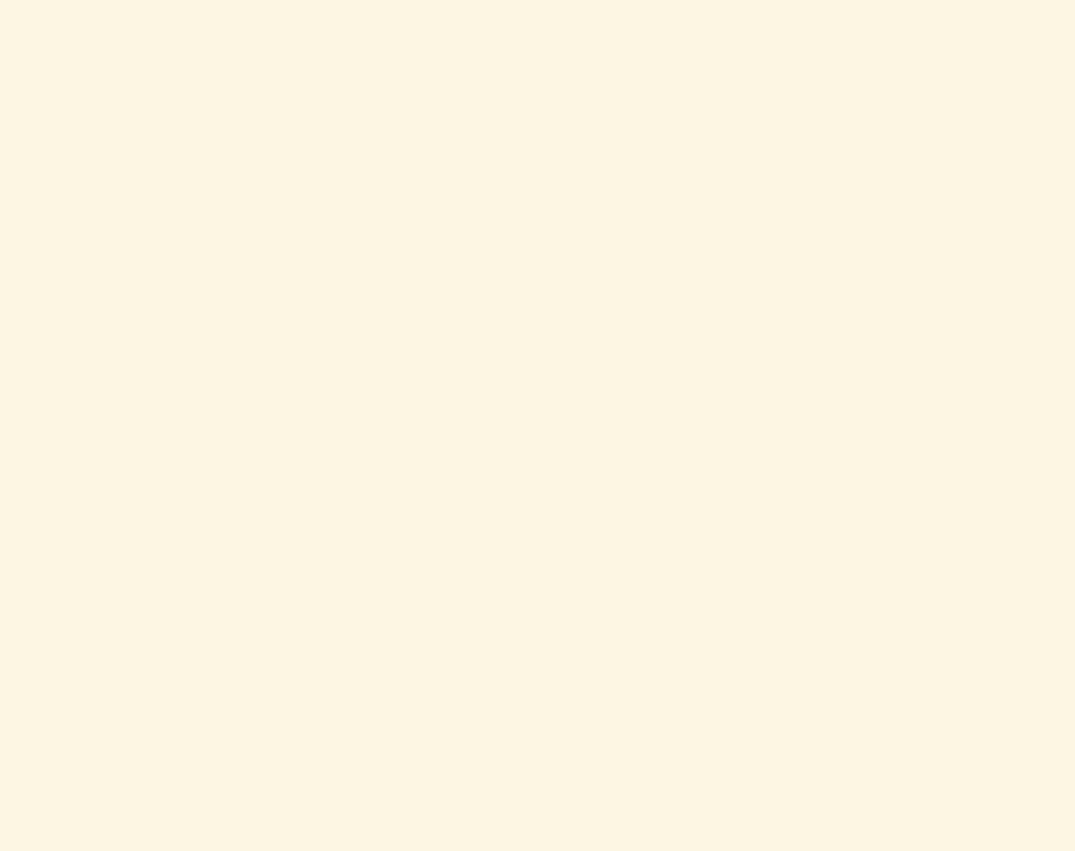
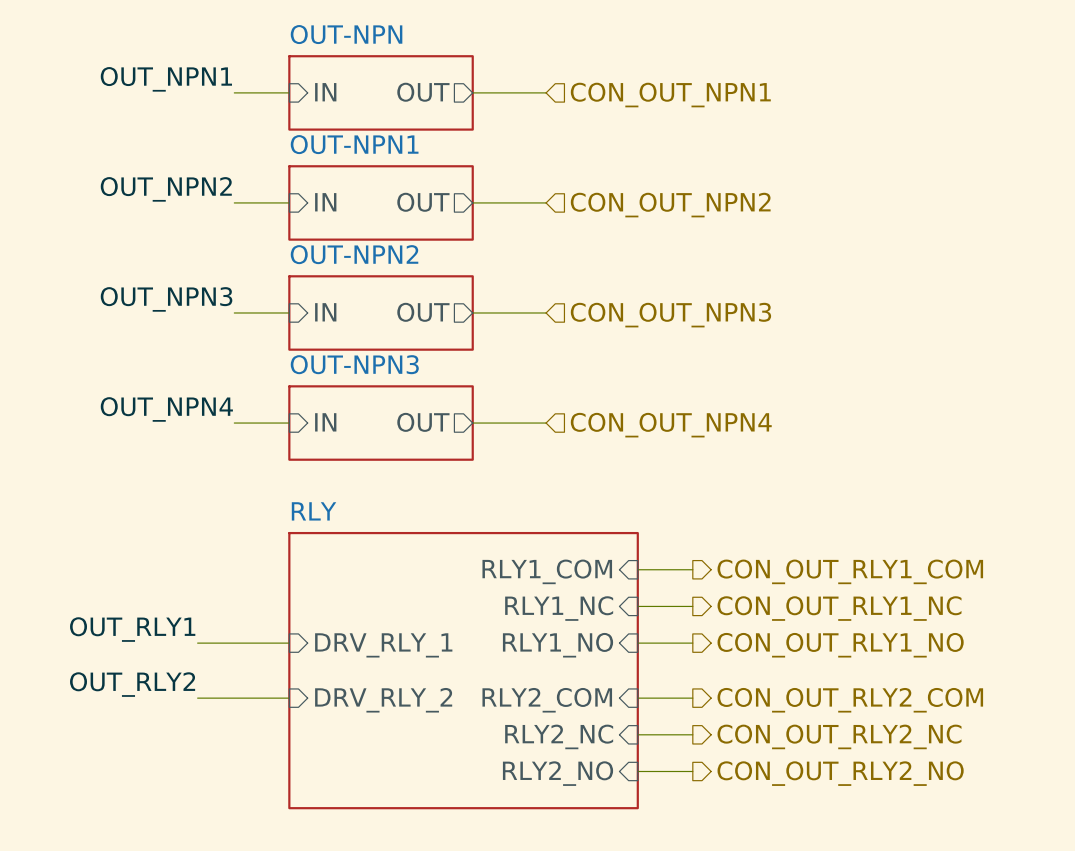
label: none -> OUT_NPN1 (166, 79)
wire: none -> (234, 92) (289, 92)
sheet pin: none -> IN (325, 92)
sheet OUT-NPN: none -> (381, 92)
sheet pin: none -> OUT (423, 92)
wire: none -> (472, 92) (546, 92)
hierarchical label: none -> CON_OUT_NPN1 (670, 95)
label: none -> OUT_NPN2 (166, 189)
wire: none -> (234, 202) (289, 202)
sheet pin: none -> IN (325, 202)
sheet OUT-NPN1: none -> (381, 202)
sheet pin: none -> OUT (423, 202)
wire: none -> (472, 202) (546, 202)
hierarchical label: none -> CON_OUT_NPN2 (670, 205)
label: none -> OUT_NPN3 (166, 299)
wire: none -> (234, 312) (289, 312)
sheet pin: none -> IN (325, 312)
sheet OUT-NPN2: none -> (381, 312)
sheet pin: none -> OUT (423, 312)
wire: none -> (472, 312) (546, 312)
hierarchical label: none -> CON_OUT_NPN3 (670, 315)
label: none -> OUT_NPN4 (166, 409)
sheet pin: none -> IN (325, 422)
sheet pin: none -> OUT (423, 422)
wire: none -> (234, 423) (289, 423)
sheet OUT-NPN3: none -> (381, 423)
wire: none -> (472, 423) (546, 423)
hierarchical label: none -> CON_OUT_NPN4 (671, 425)
wire: none -> (637, 569) (692, 569)
sheet pin: none -> RLY1_COM (547, 571)
hierarchical label: none -> CON_OUT_RLY1_COM (850, 571)
wire: none -> (637, 606) (692, 606)
sheet pin: none -> RLY1_NC (559, 608)
hierarchical label: none -> CON_OUT_RLY1_NC (839, 608)
label: none -> OUT_RLY1 (132, 629)
wire: none -> (197, 643) (289, 643)
wire: none -> (637, 643) (692, 643)
sheet pin: none -> DRV_RLY_1 (383, 645)
sheet pin: none -> RLY1_NO (558, 645)
hierarchical label: none -> CON_OUT_RLY1_NO (840, 645)
sheet RLY: none -> (463, 670)
label: none -> OUT_RLY2 (132, 684)
wire: none -> (197, 698) (289, 698)
wire: none -> (637, 698) (692, 698)
sheet pin: none -> DRV_RLY_2 (383, 700)
sheet pin: none -> RLY2_COM (547, 700)
hierarchical label: none -> CON_OUT_RLY2_COM (850, 700)
wire: none -> (637, 734) (692, 734)
sheet pin: none -> RLY2_NC (559, 736)
hierarchical label: none -> CON_OUT_RLY2_NC (839, 736)
wire: none -> (637, 771) (692, 771)
sheet pin: none -> RLY2_NO (558, 773)
hierarchical label: none -> CON_OUT_RLY2_NO (840, 773)

